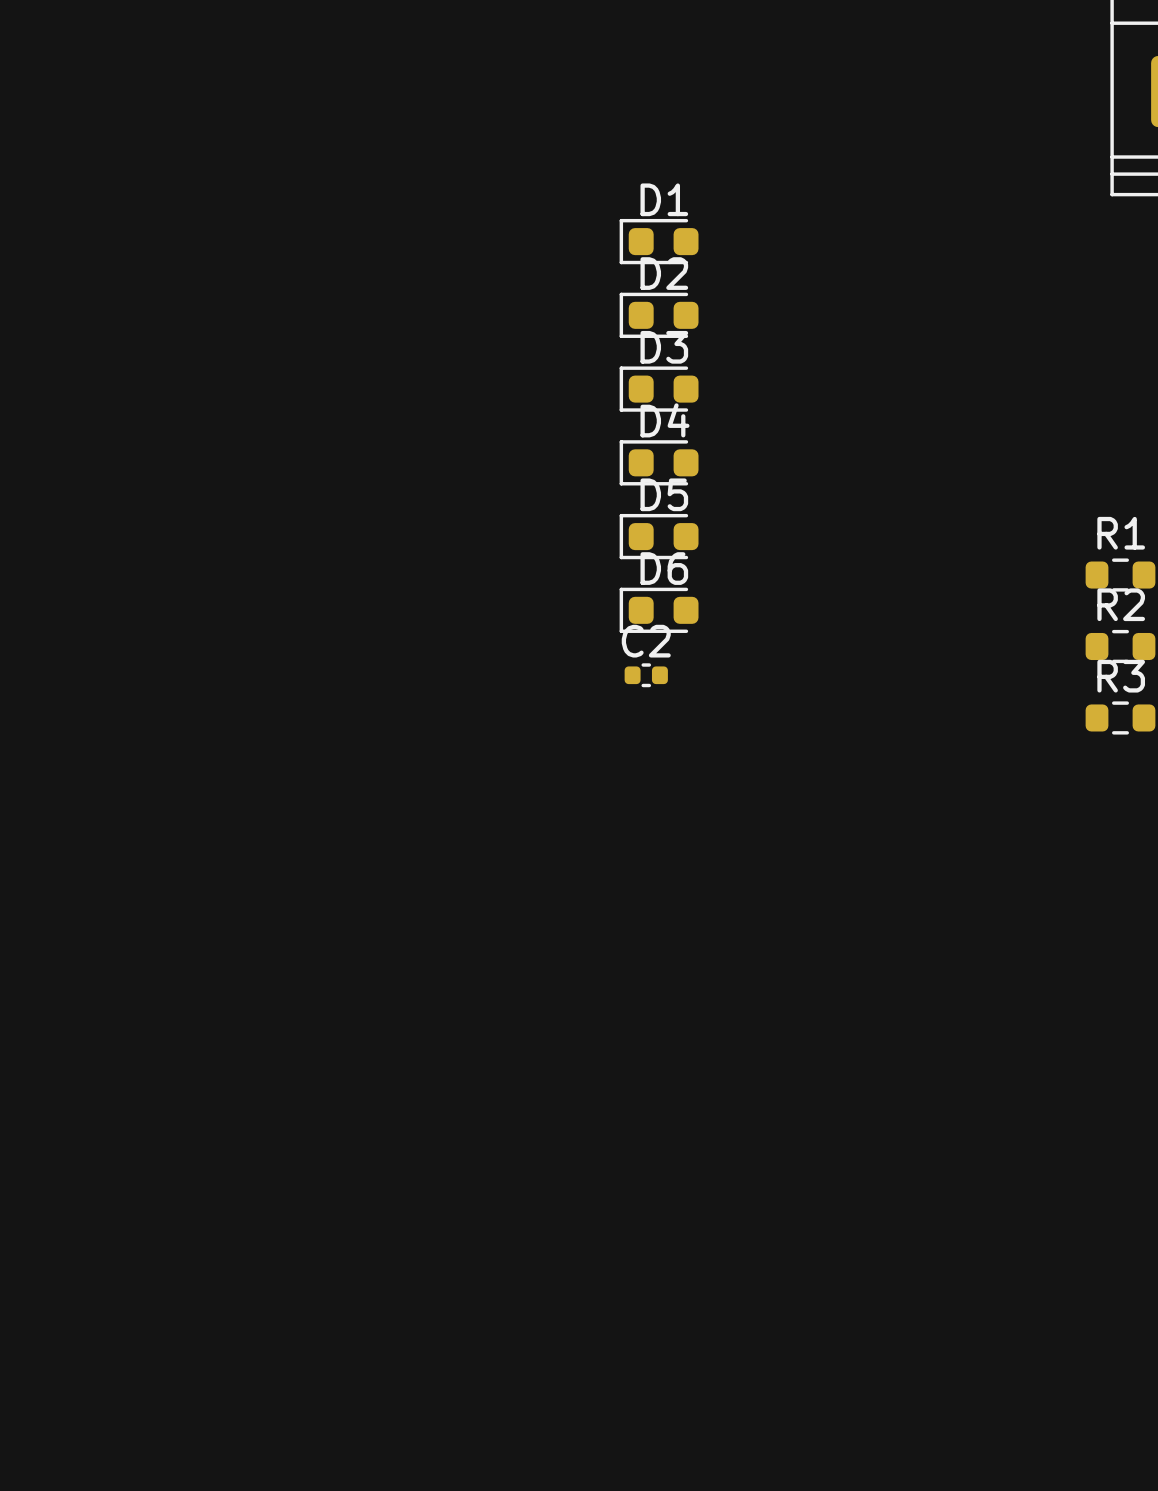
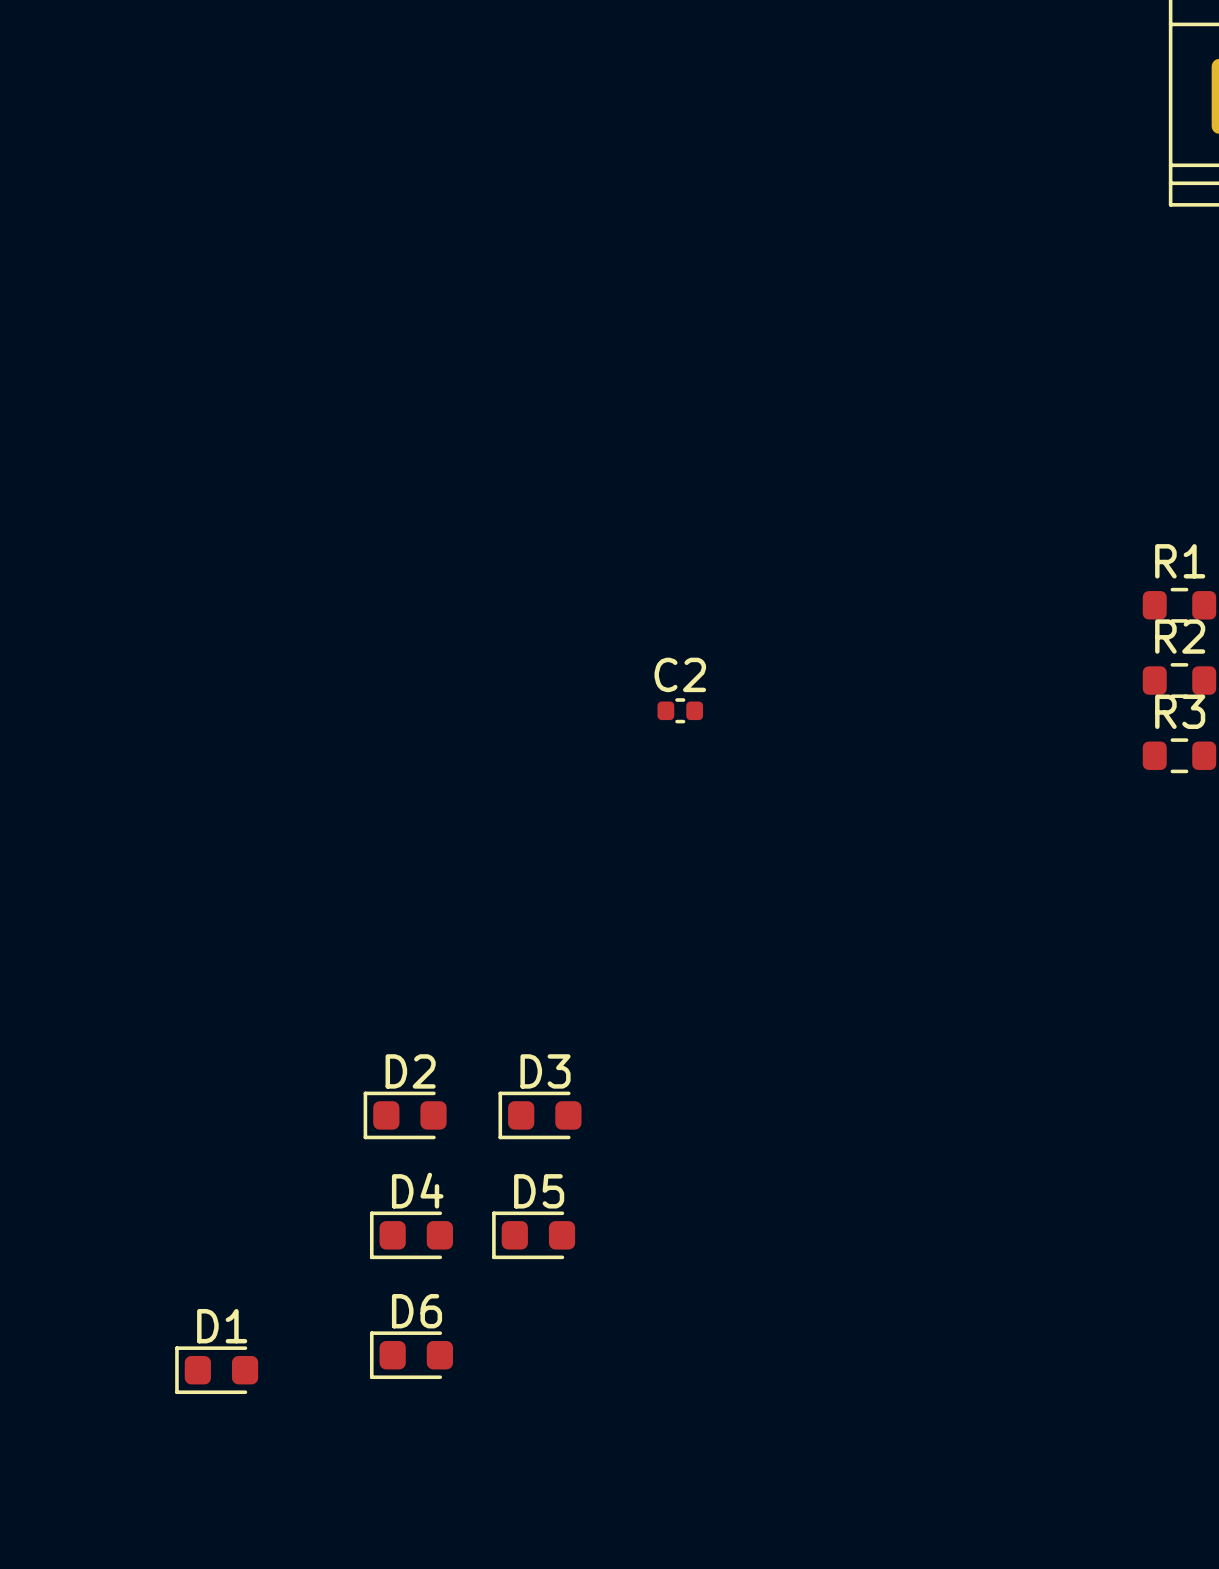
D1 position: (659, 241) -> (216, 1370)
D2 position: (659, 315) -> (405, 1115)
D3 position: (659, 389) -> (540, 1115)
D4 position: (659, 462) -> (411, 1235)
D5 position: (659, 536) -> (533, 1235)
D6 position: (659, 610) -> (411, 1355)

